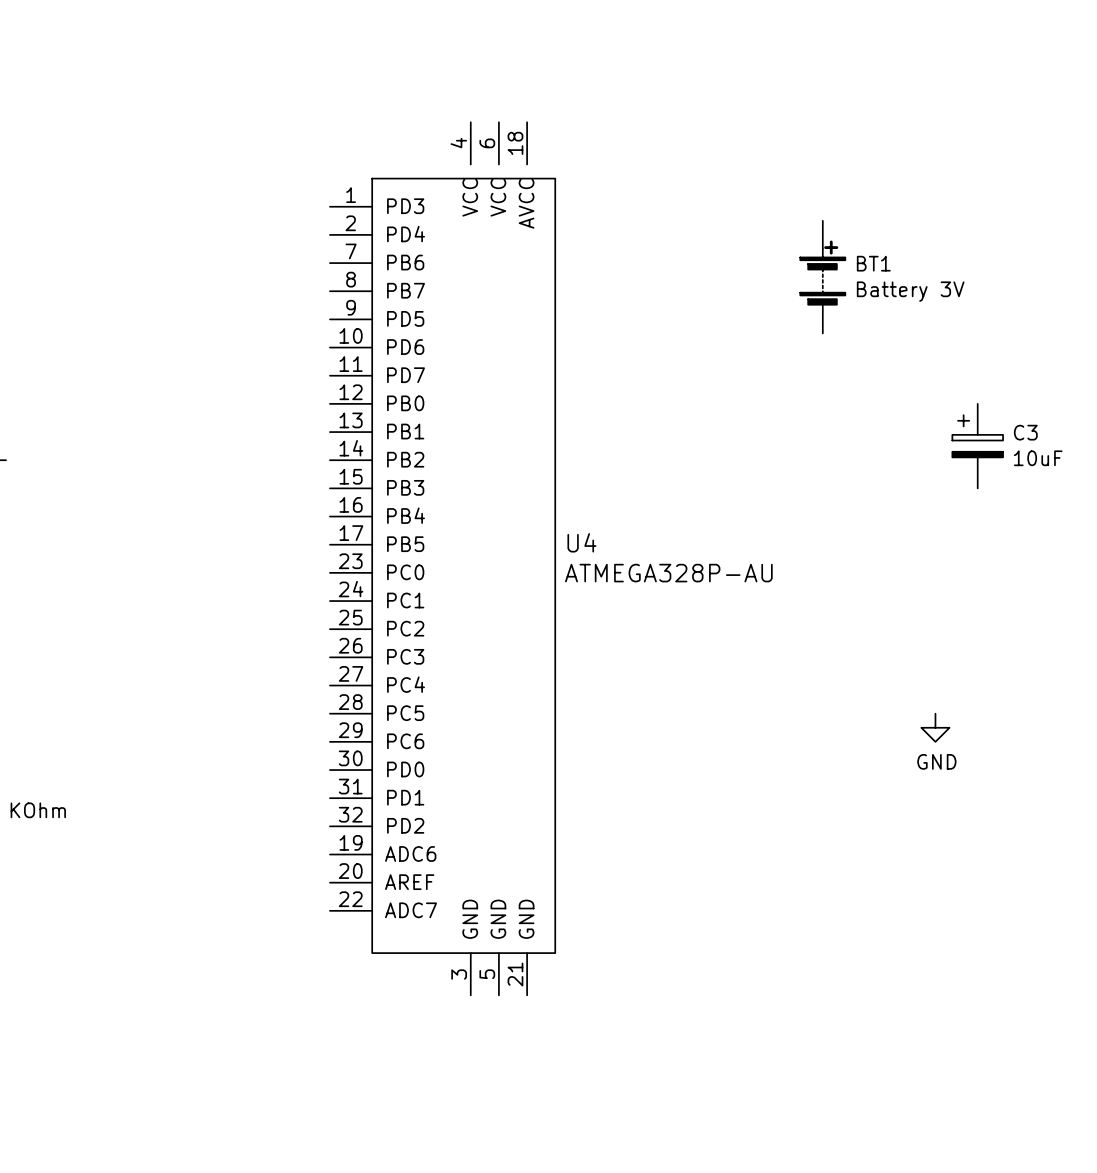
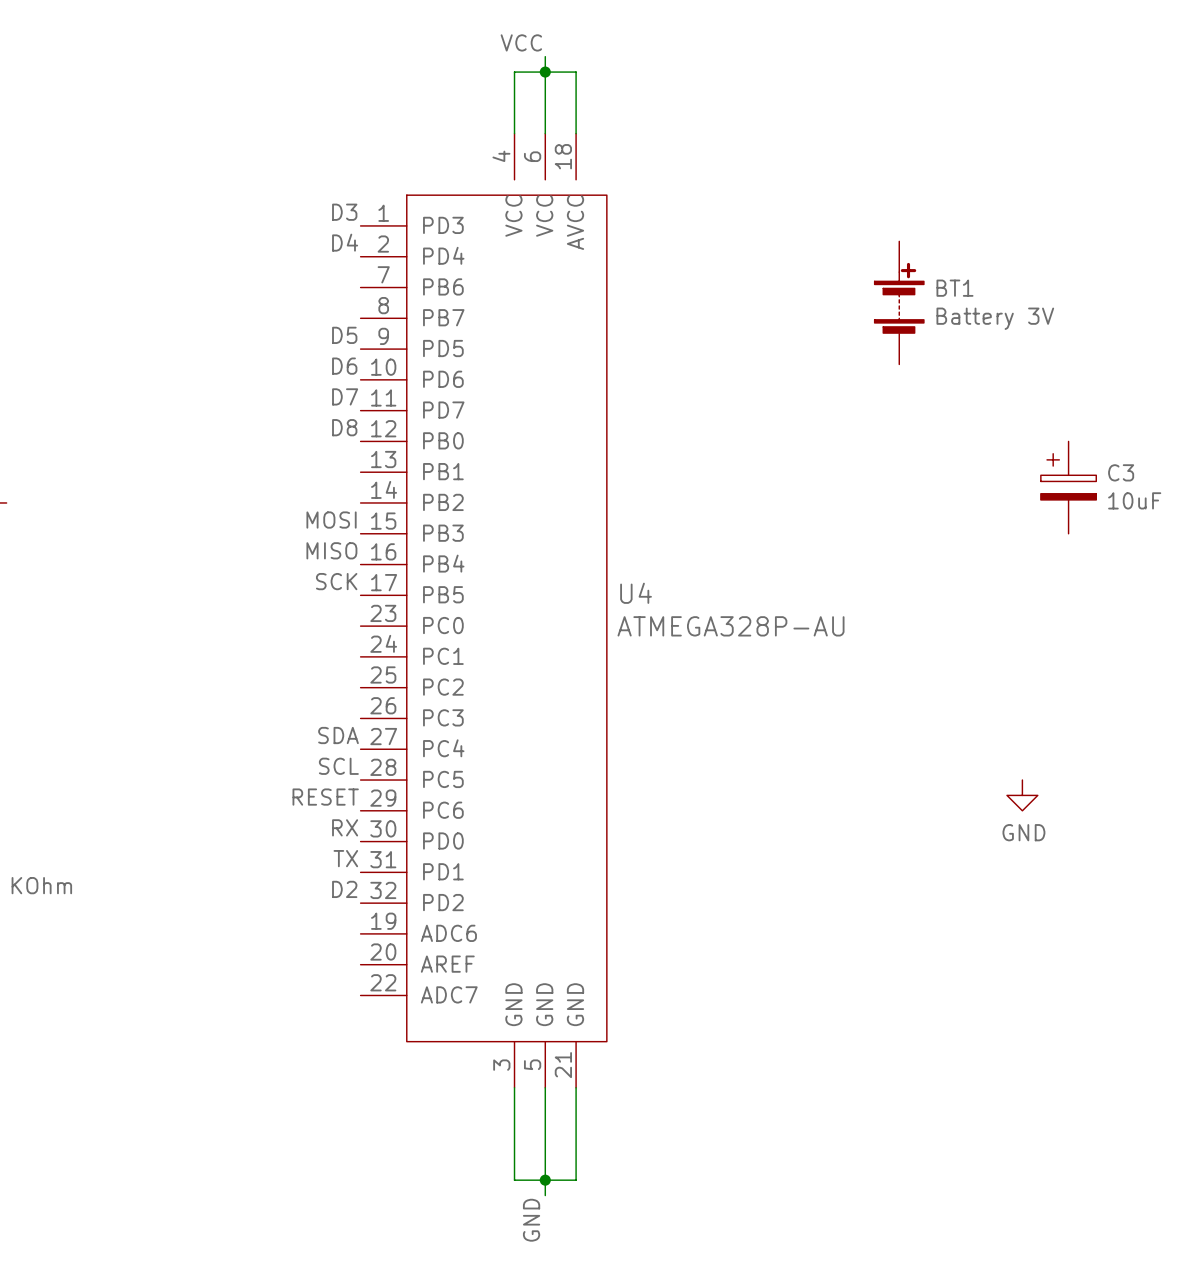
label: none -> VCC (521, 42)
wire: none -> (545, 56) (545, 133)
junction: none -> (545, 72)
wire: none -> (514, 133) (514, 72) (576, 72) (576, 133)
label: none -> D3 (344, 212)
label: none -> D4 (345, 242)
label: none -> D5 (344, 335)
label: none -> D6 (344, 366)
label: none -> D7 (345, 396)
label: none -> D8 (344, 427)
label: none -> MOSI (331, 520)
label: none -> MISO (331, 550)
label: none -> SCK (336, 581)
label: none -> SDA (338, 735)
label: none -> SCL (338, 766)
label: none -> RESET (325, 797)
label: none -> RX (345, 827)
label: none -> TX (345, 858)
label: none -> D2 (344, 889)
wire: none -> (514, 1087) (514, 1180) (576, 1180) (576, 1087)
wire: none -> (545, 1087) (545, 1195)
junction: none -> (545, 1180)
label: none -> GND (531, 1220)

